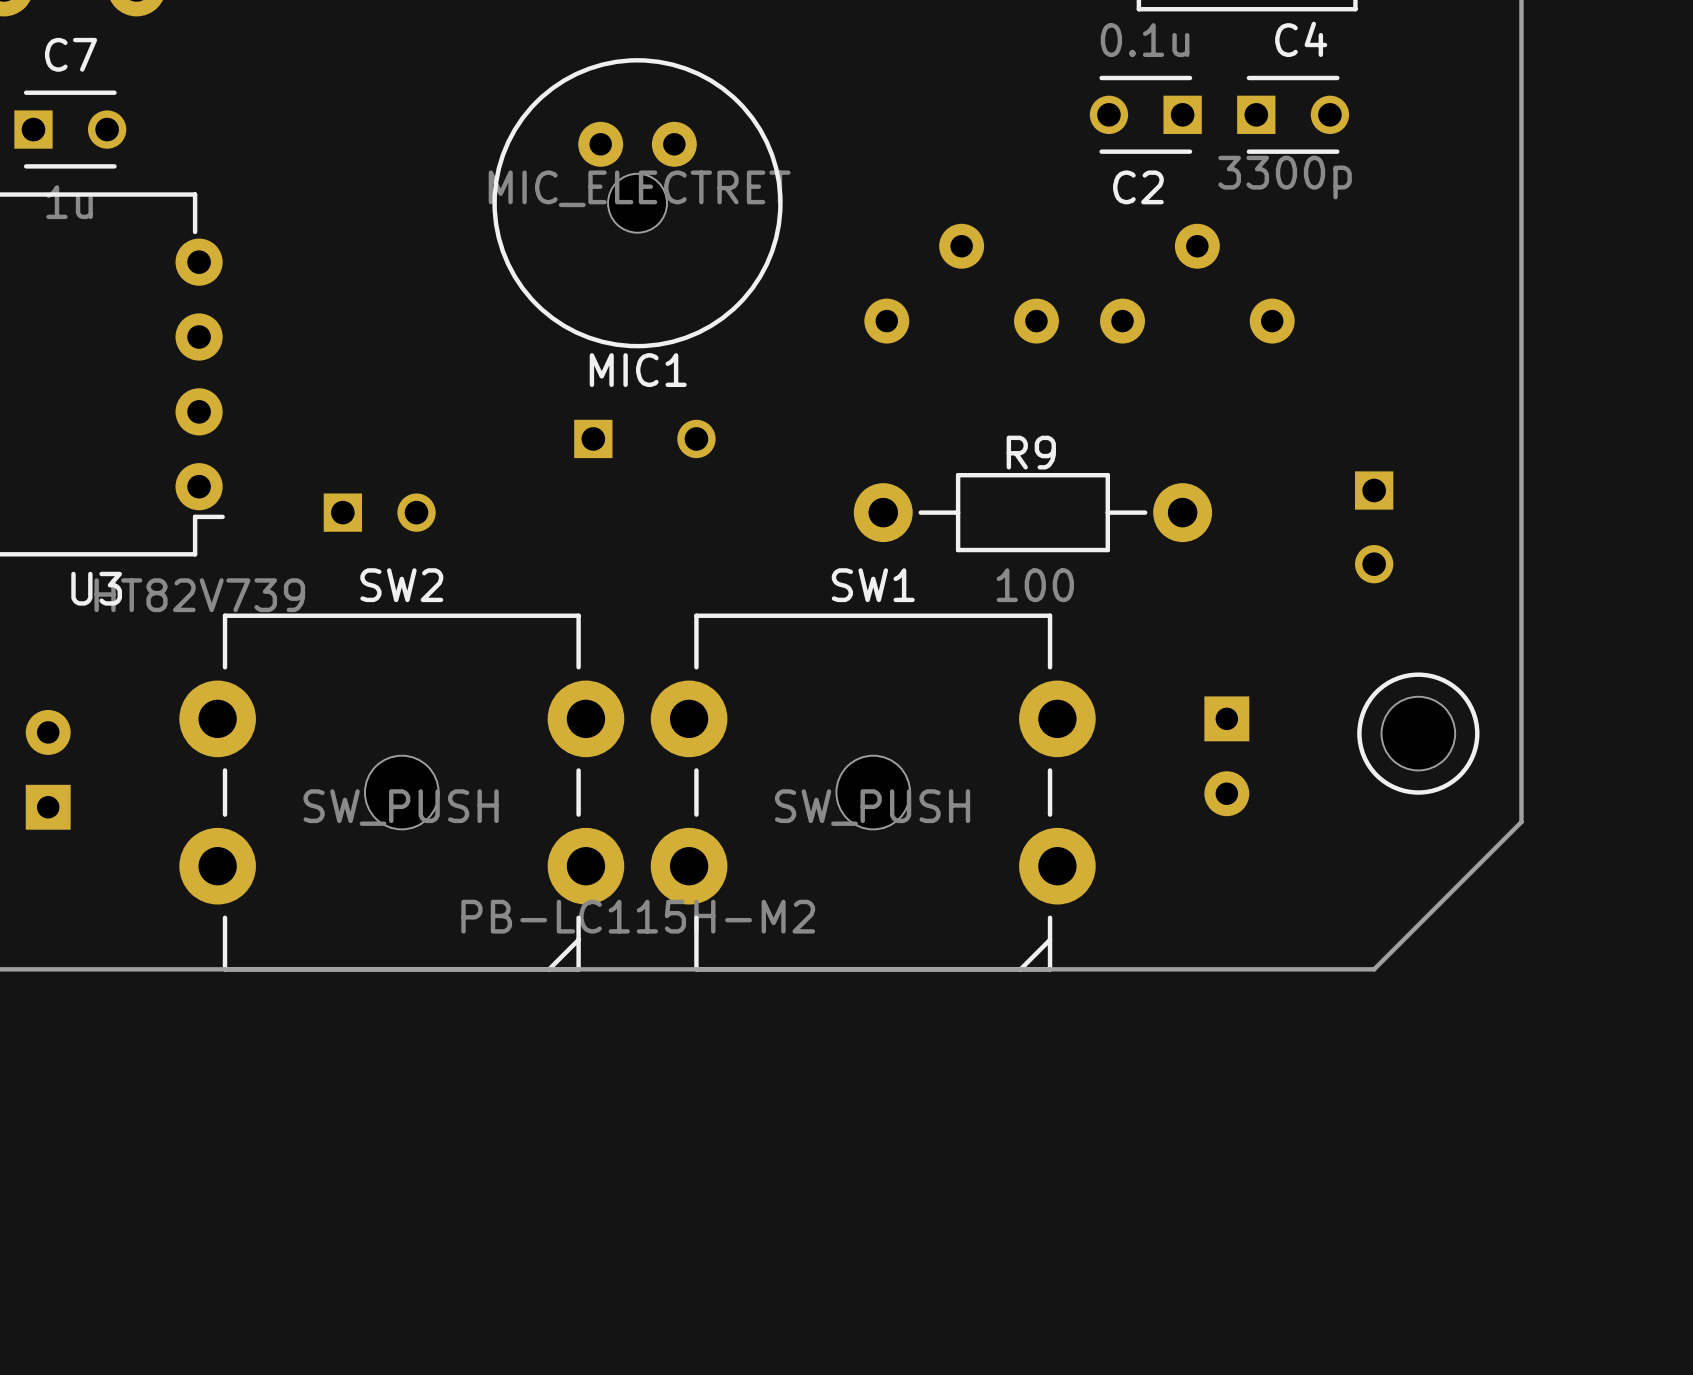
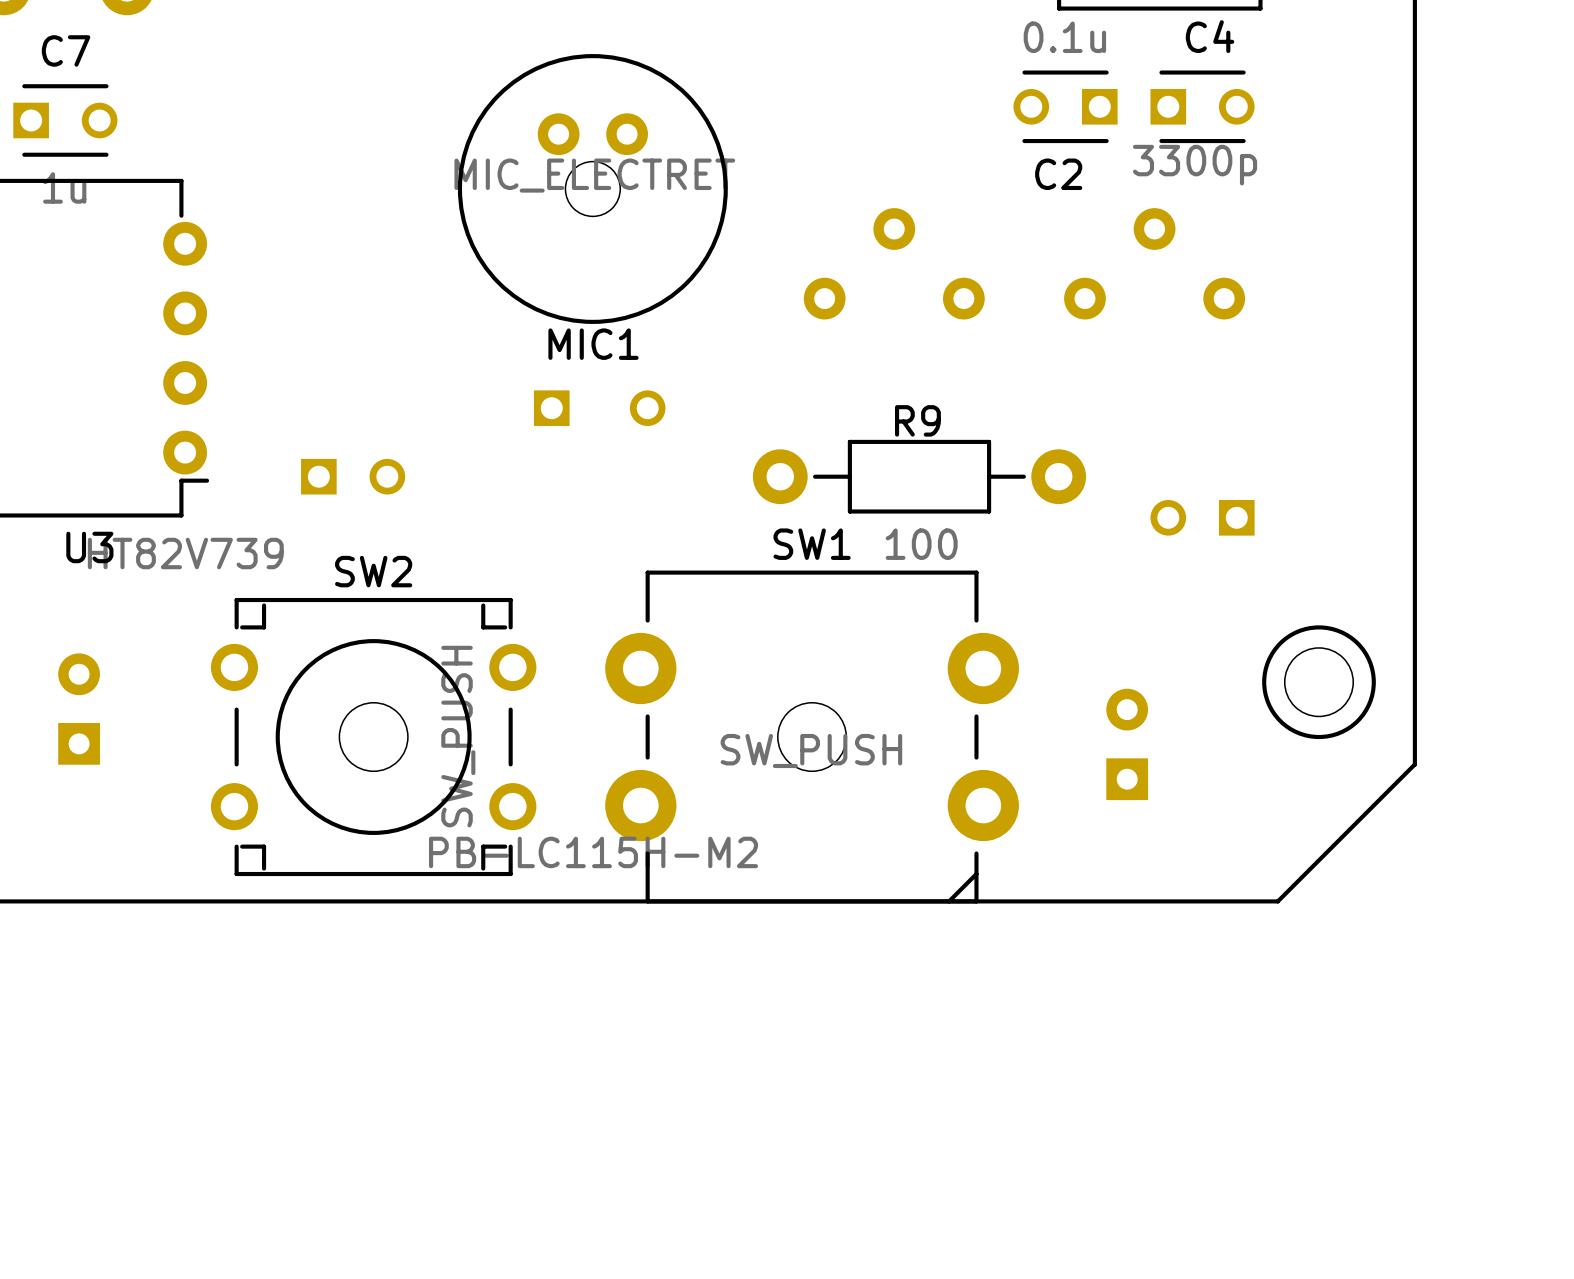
part position: (1197, 283) -> (1154, 263)
R9 position: (1032, 512) -> (919, 476)
part rotation: 0° (1374, 527) -> 90° clockwise (1202, 517)
part position: (1374, 527) -> (1202, 517)
SW2 footprint: [179, 613, 625, 972] -> [210, 597, 537, 877]
part rotation: 0° (1226, 756) -> 180° (1127, 744)
part position: (48, 769) -> (79, 709)
SW2 value position: SW_PUSH (401, 807) -> SW_PUSH (458, 736)

